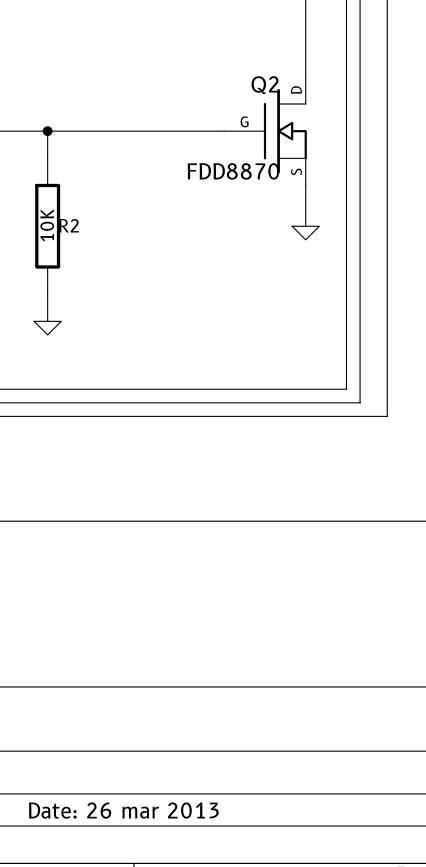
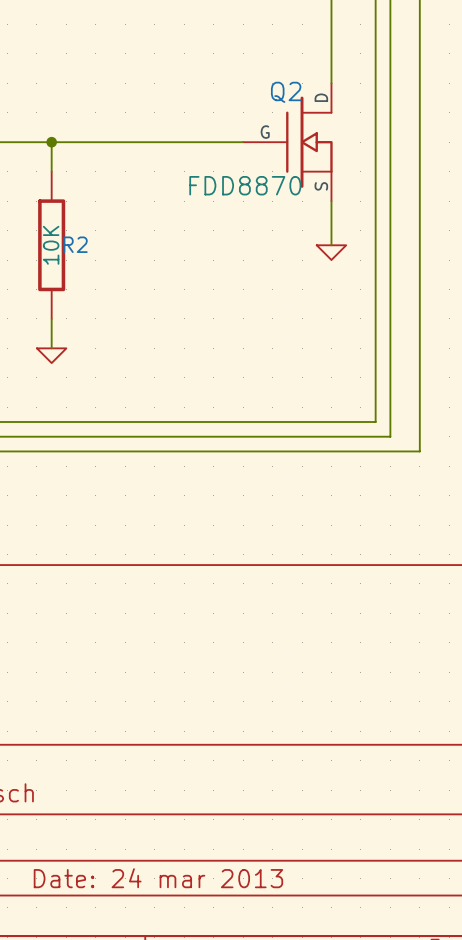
title block: Date: 26 mar 2013 (123, 810) -> Date: 24 mar 2013 (158, 878)

